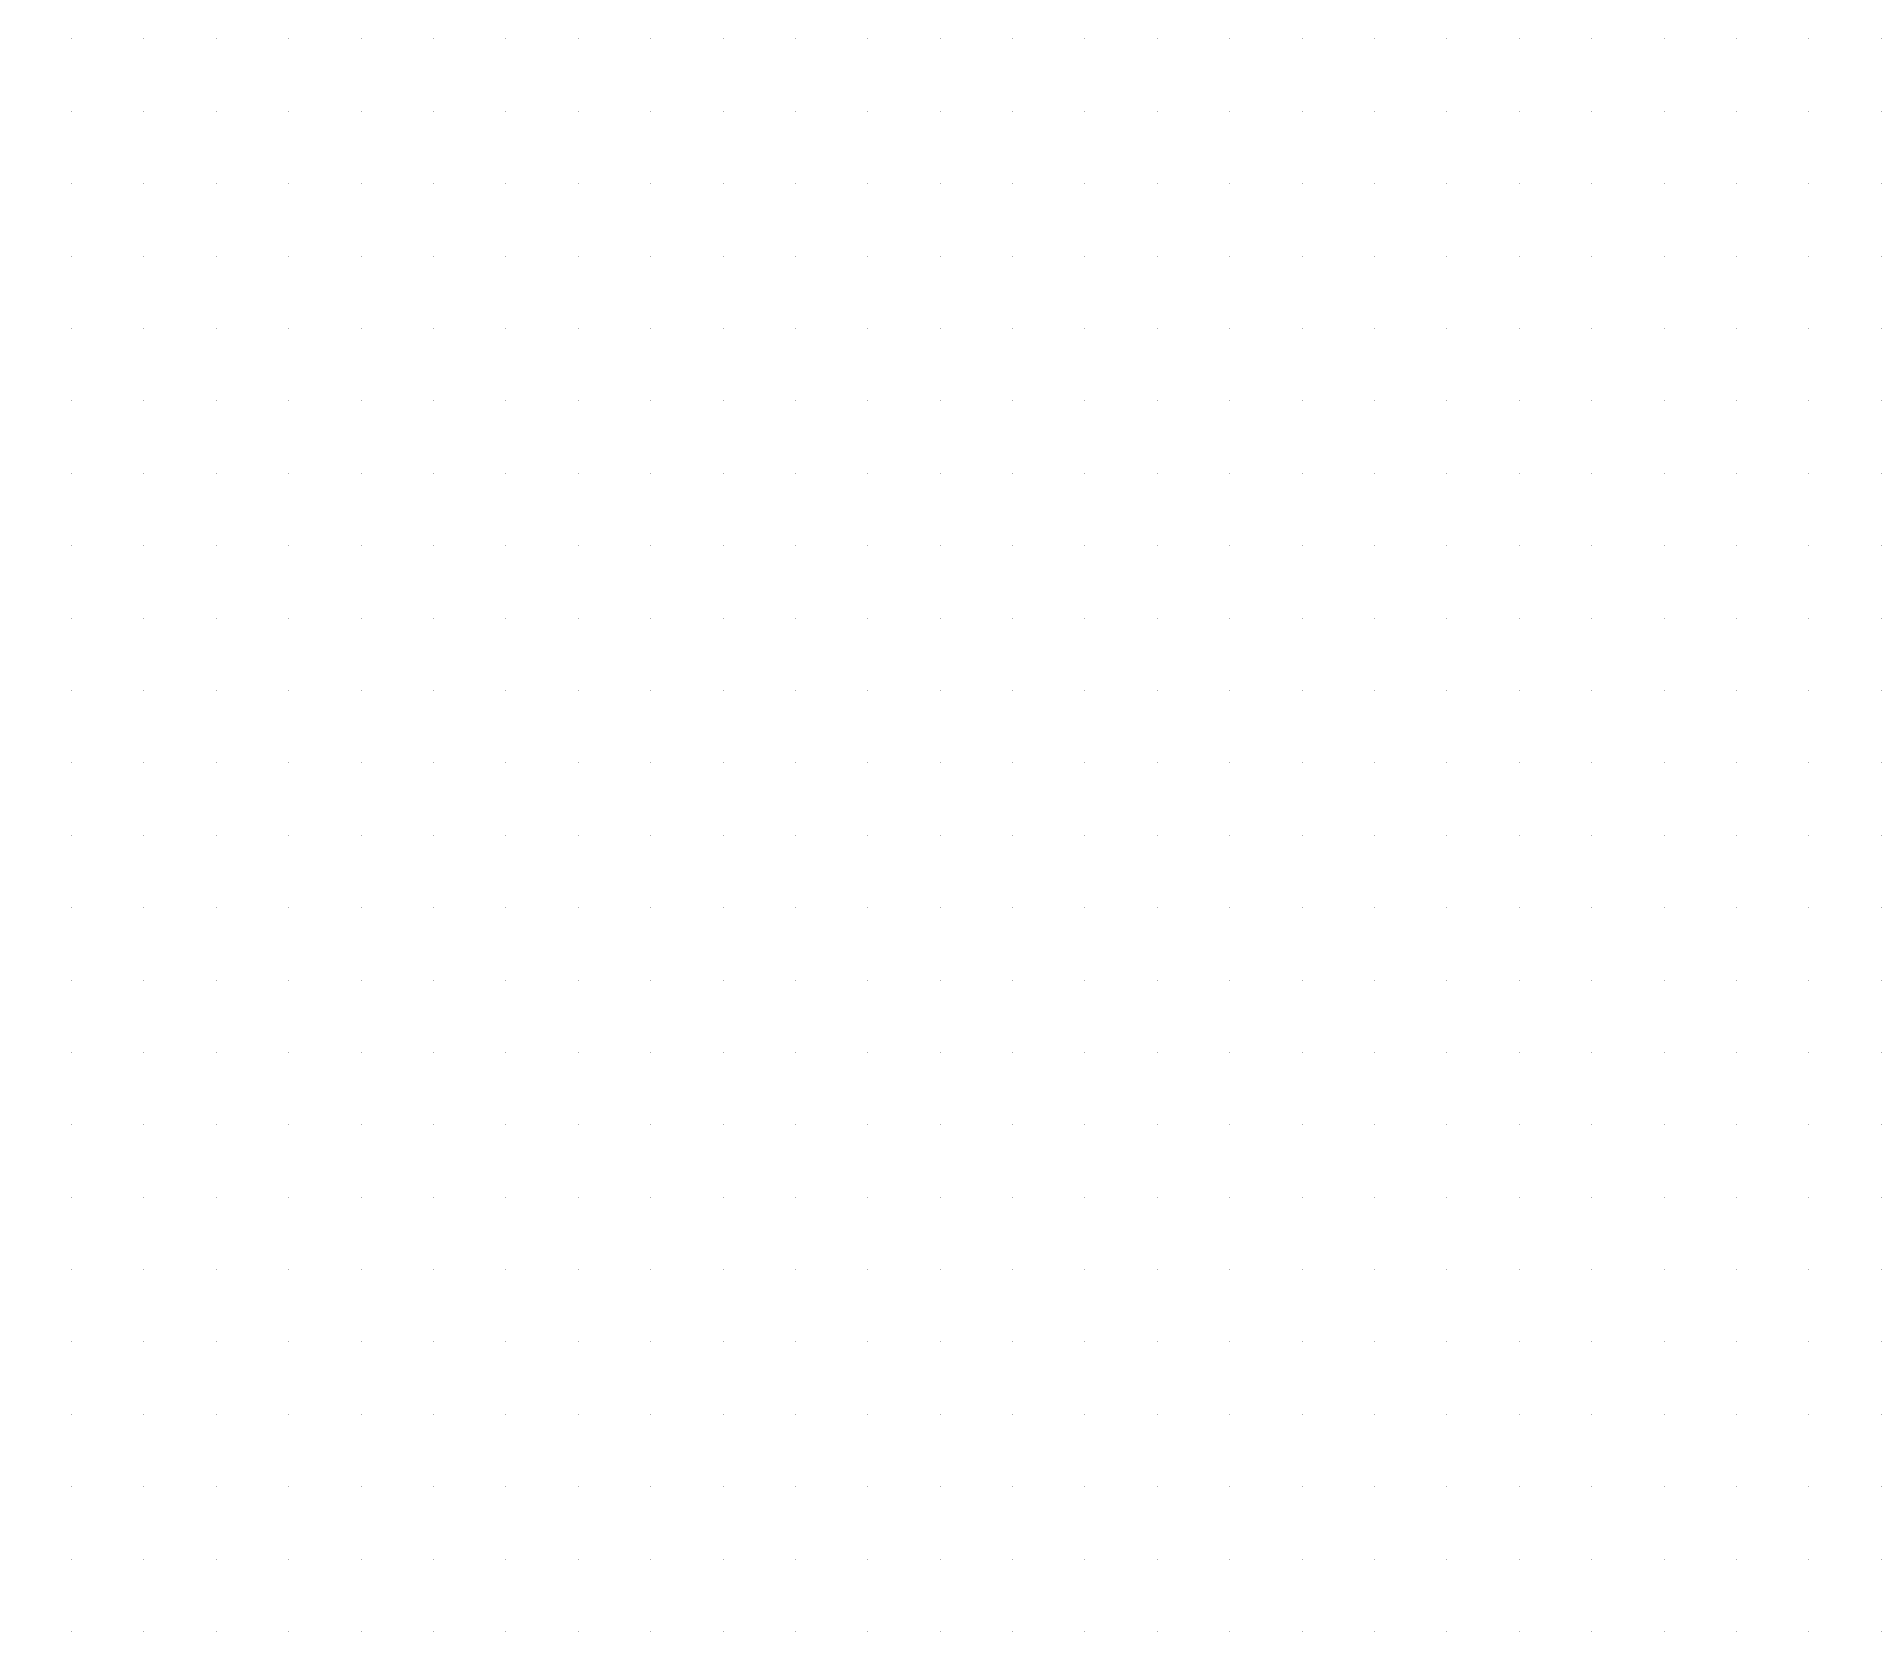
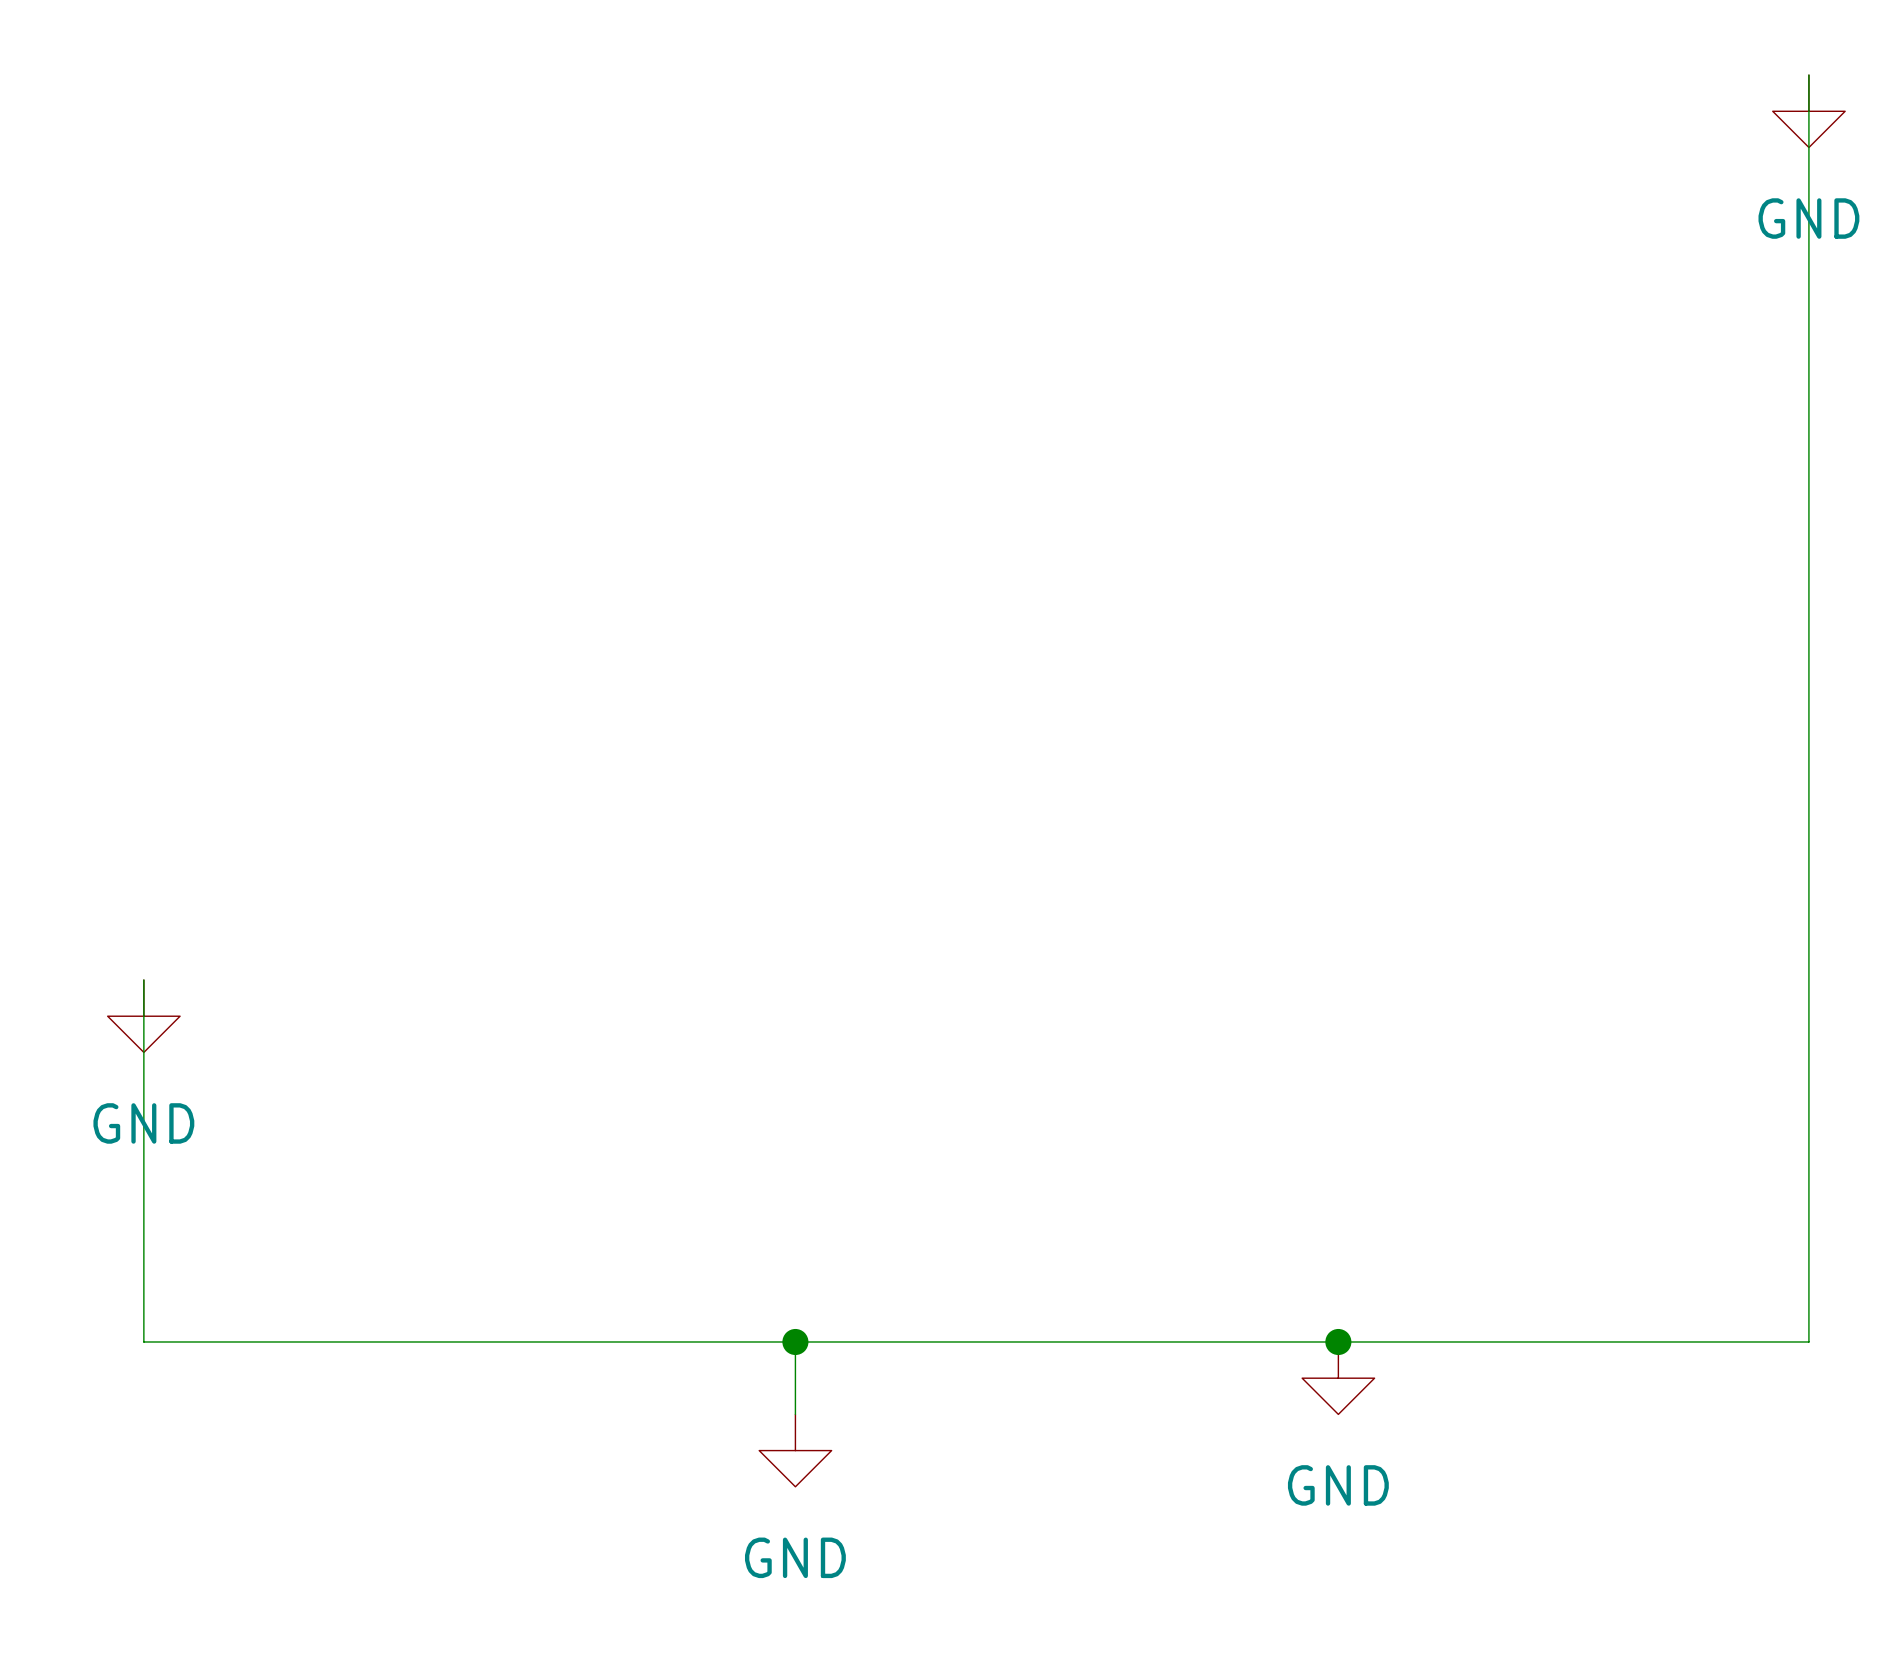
wire: none -> (1808, 75) (1808, 1341) (143, 1341) (143, 980)
power symbol: none -> GND (1808, 111)
power symbol: none -> GND (143, 1016)
wire: none -> (795, 1341) (795, 1414)
junction: none -> (795, 1341)
junction: none -> (1338, 1341)
power symbol: none -> GND (1338, 1378)
power symbol: none -> GND (795, 1450)

